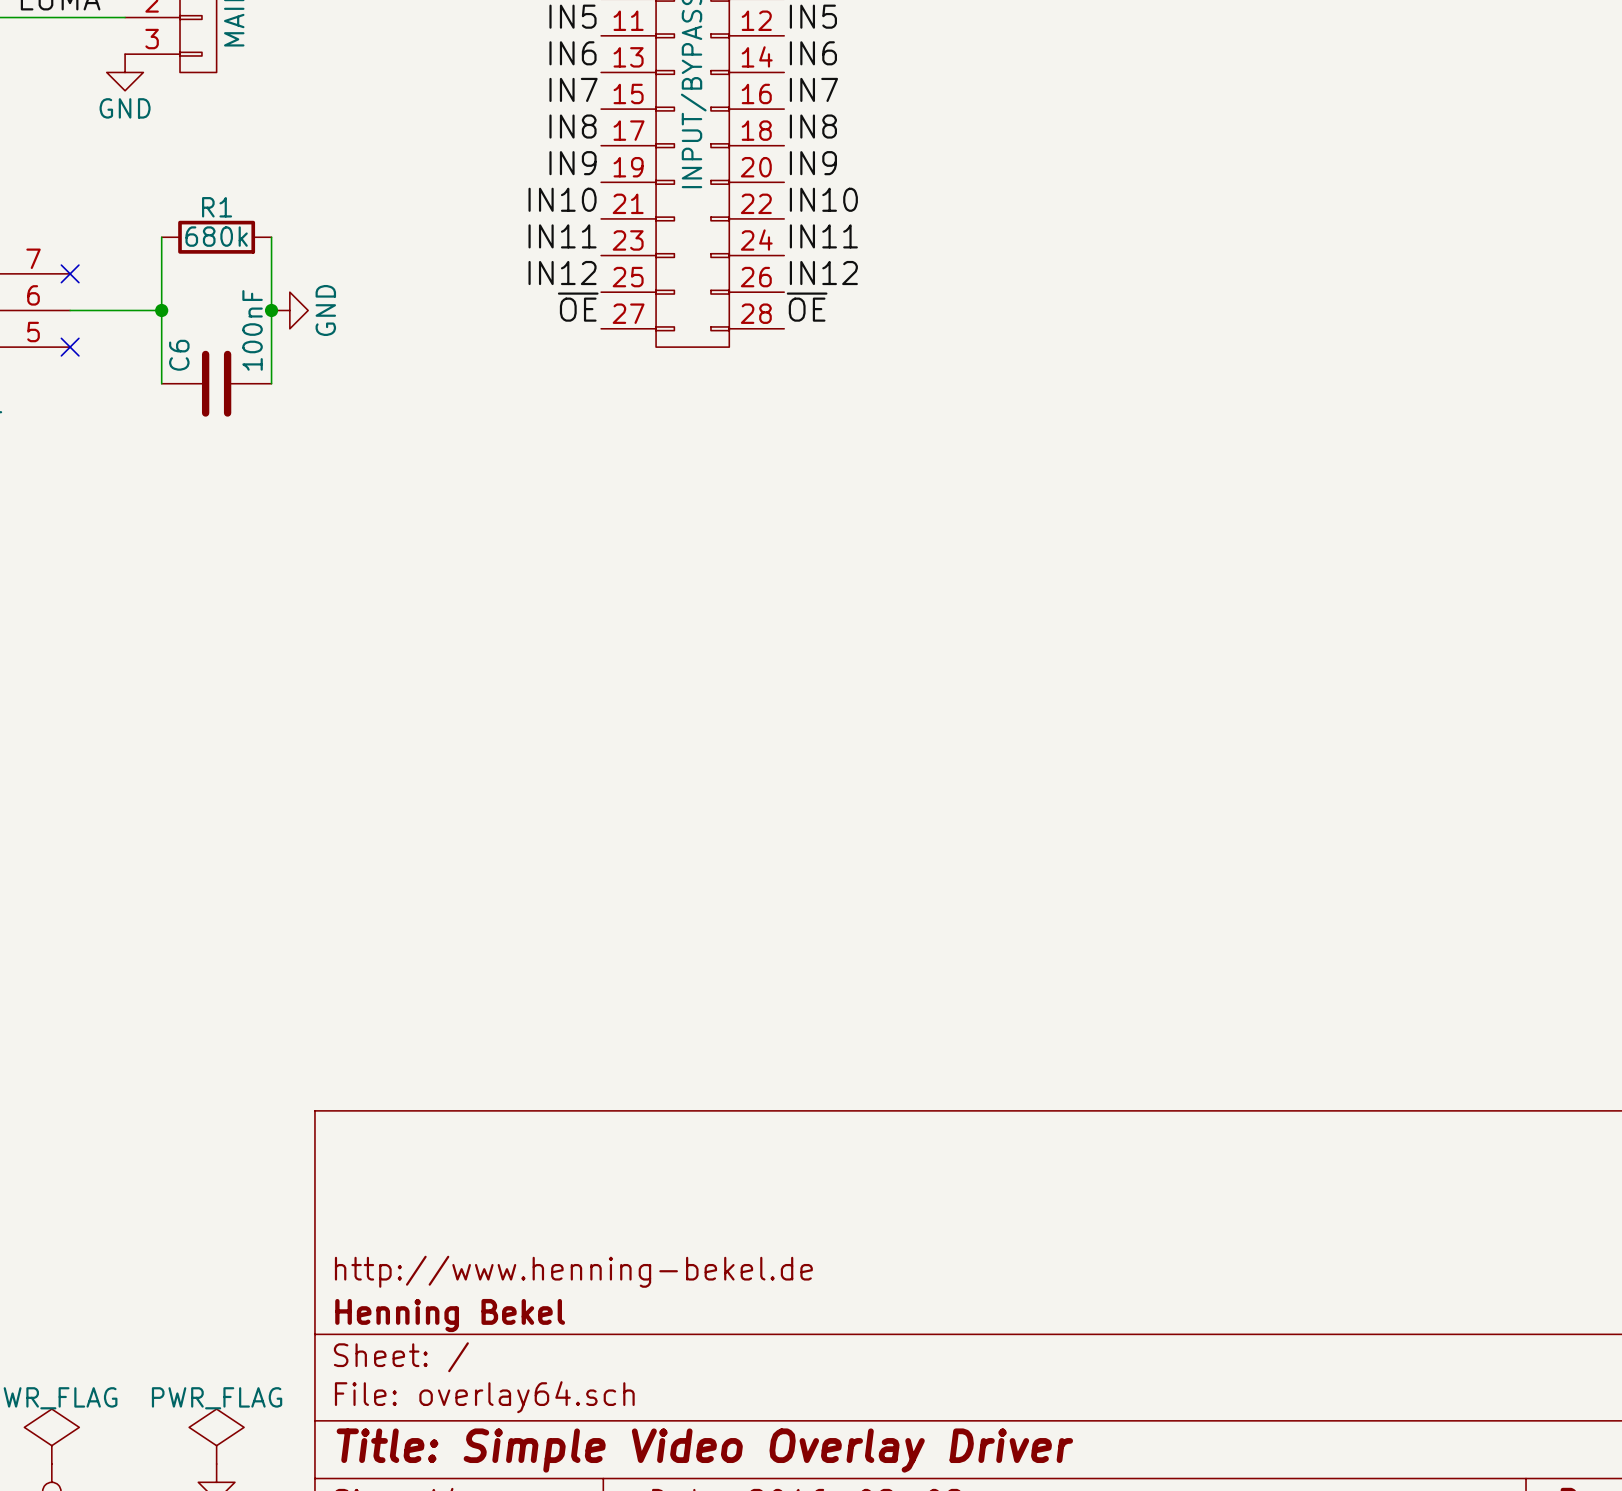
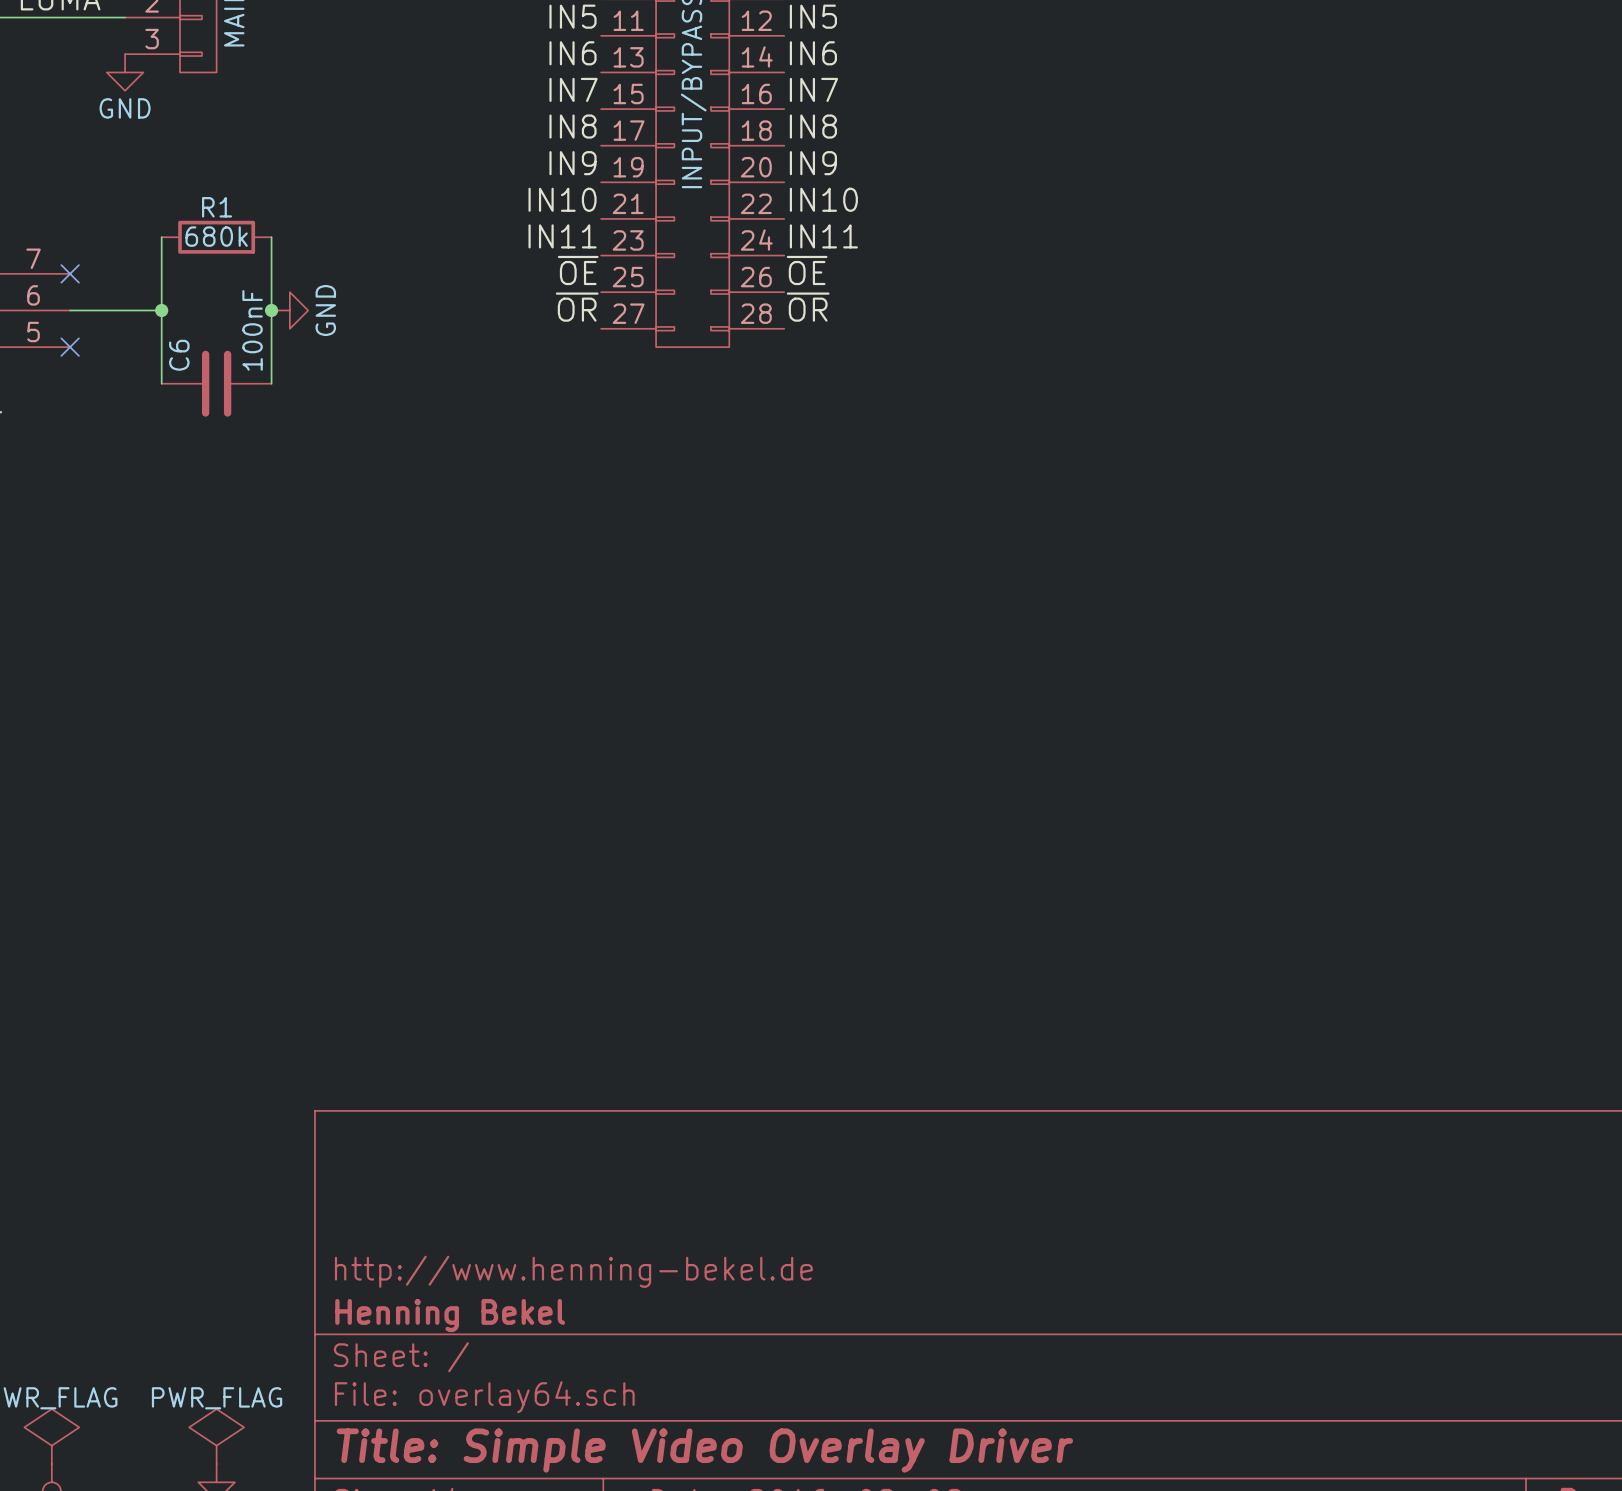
label: IN12 (562, 273) -> ~{OE} (578, 270)
label: IN12 (823, 273) -> ~{OE} (807, 270)
label: ~{OE} (578, 307) -> ~{OR} (577, 307)
label: ~{OE} (807, 307) -> ~{OR} (808, 307)

